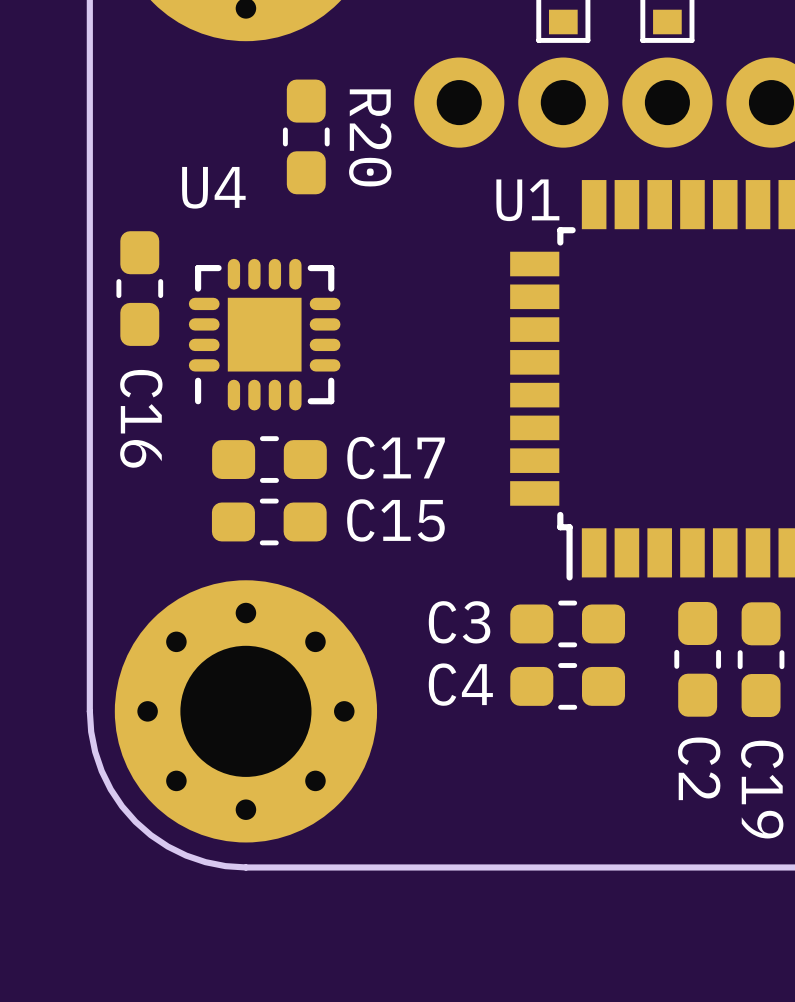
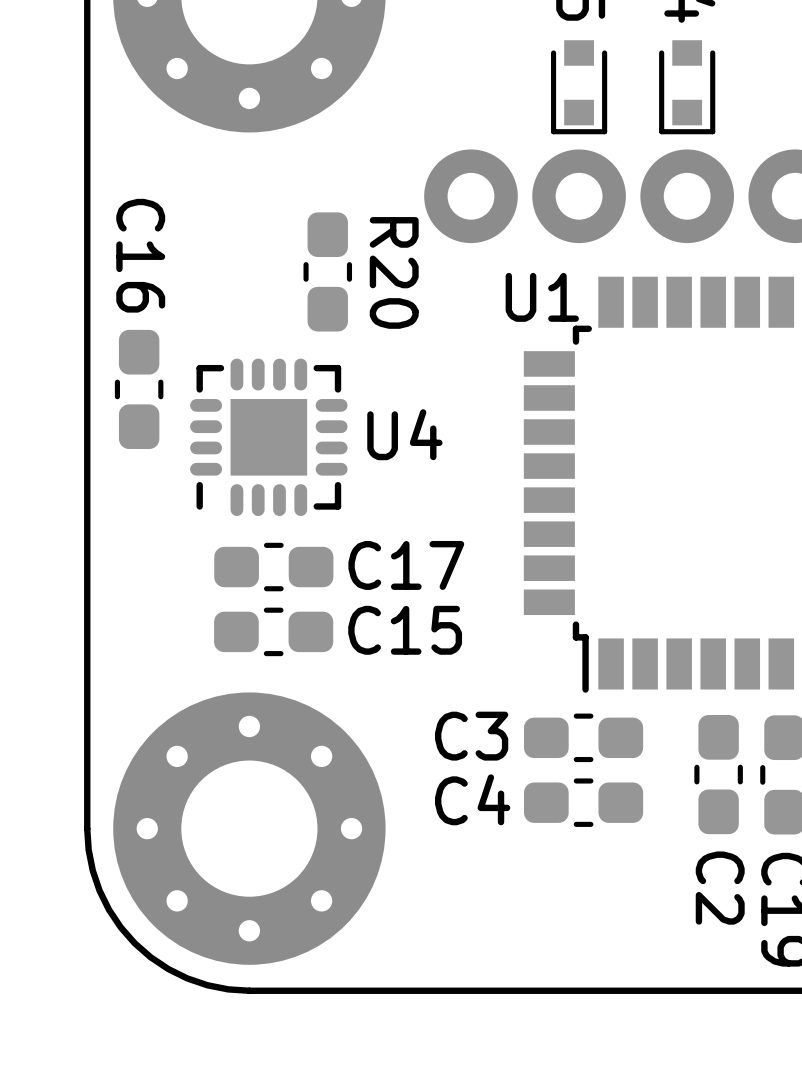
R20 position: (306, 136) -> (327, 271)
U4 name position: U4 (213, 187) -> U4 (404, 434)
C16 name position: C16 (141, 418) -> C16 (140, 255)

